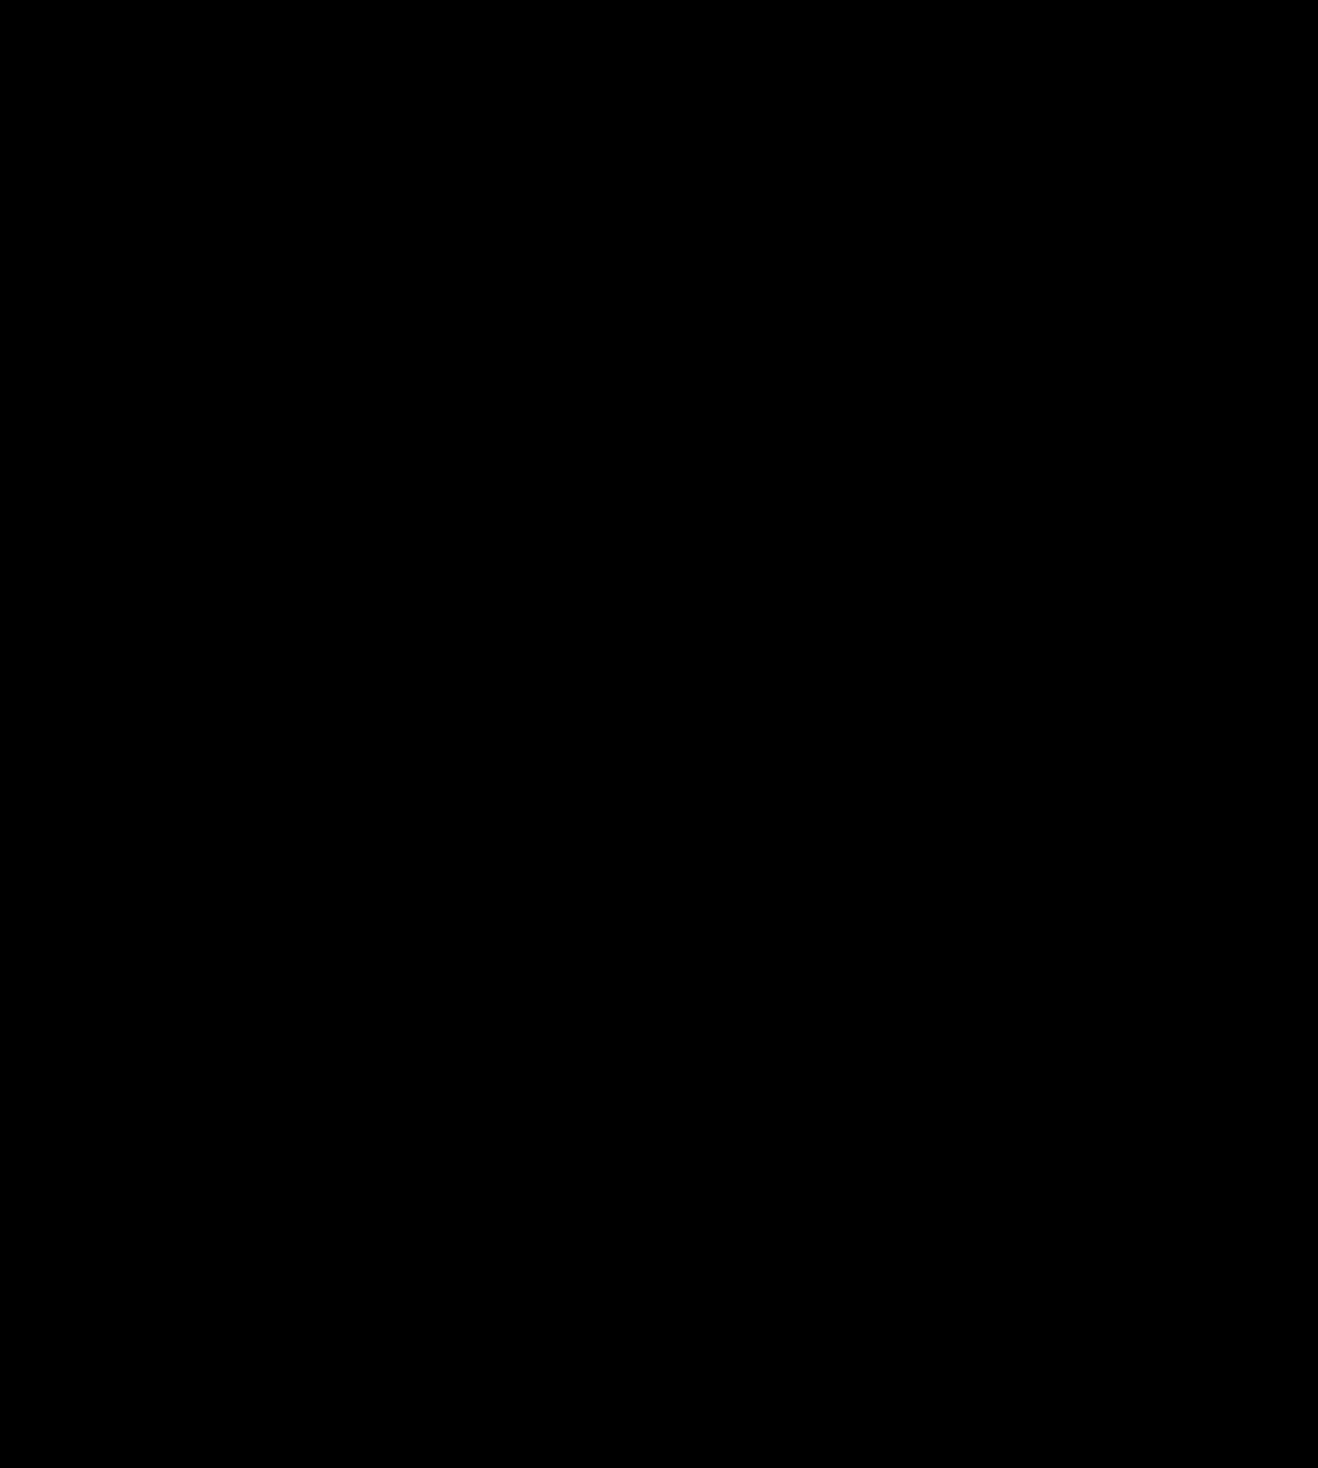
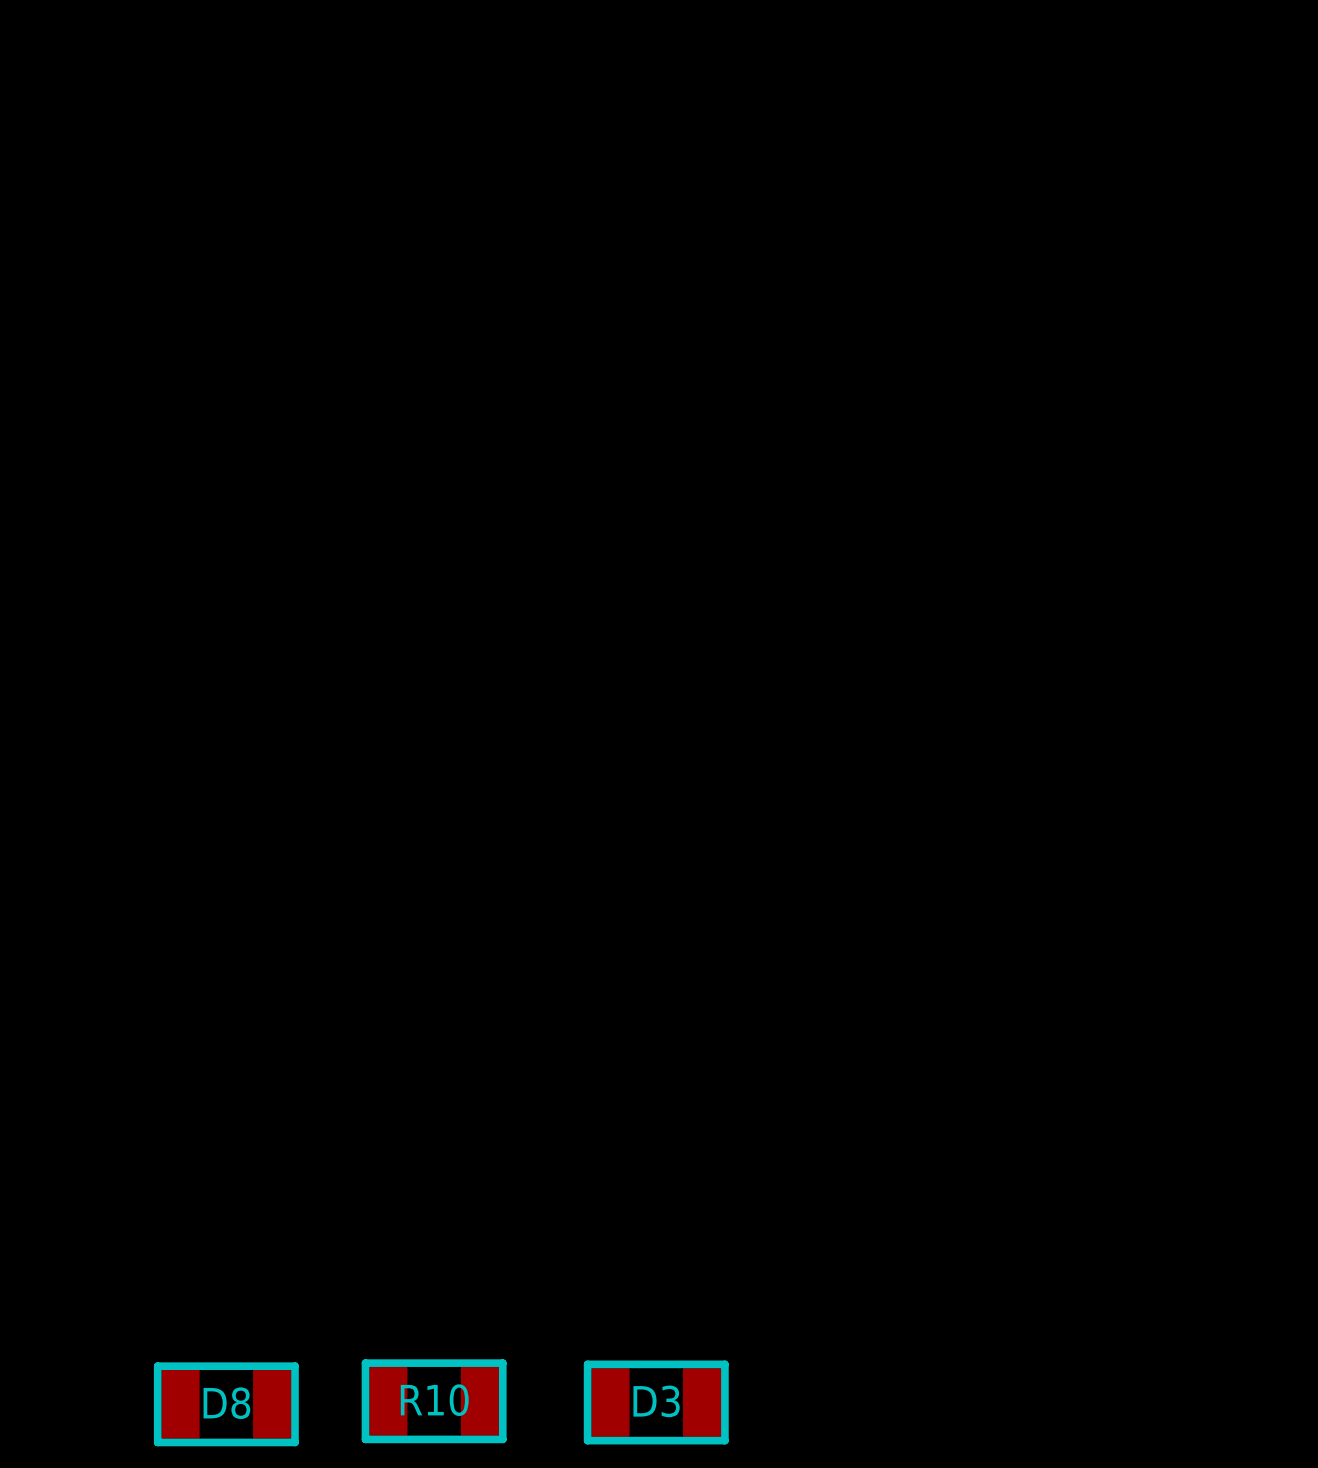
R10: none -> (434, 1401)
D3: none -> (656, 1402)
D8: none -> (226, 1404)

